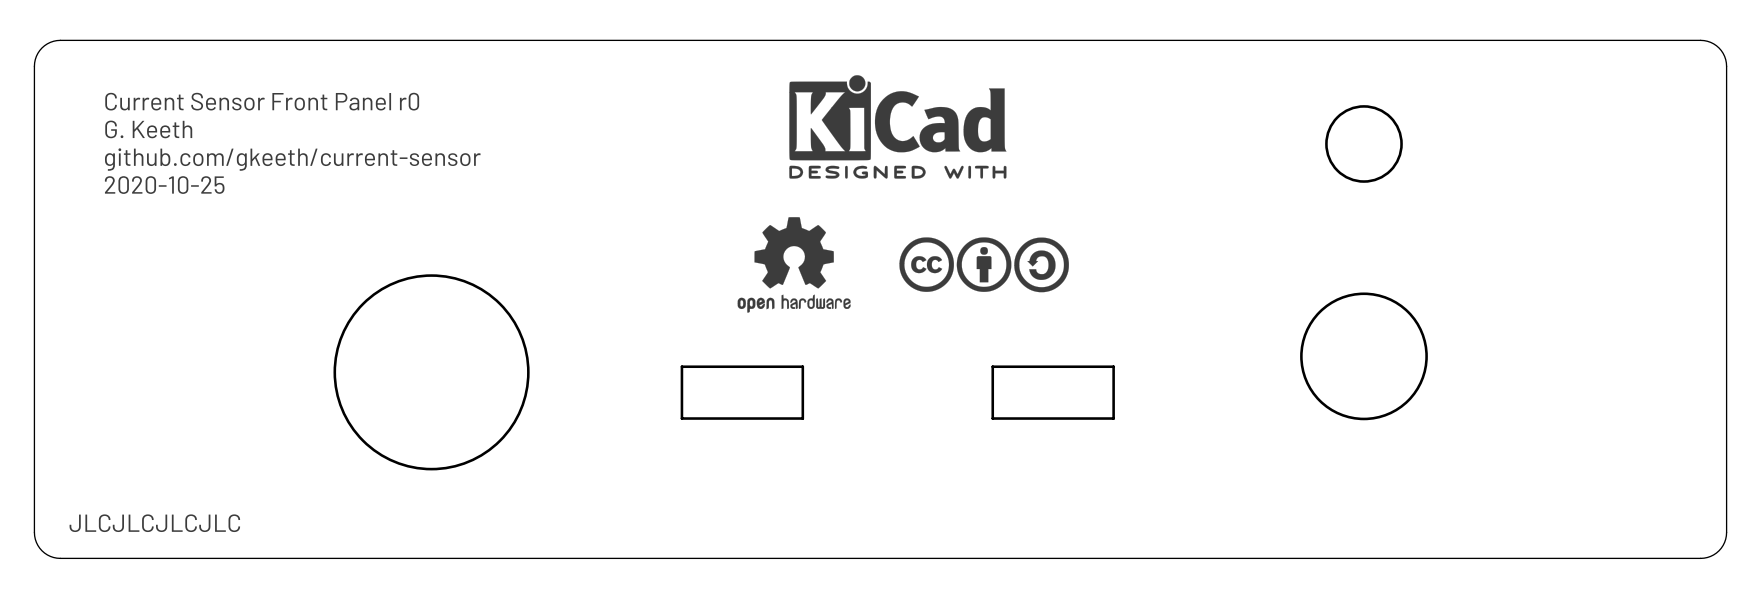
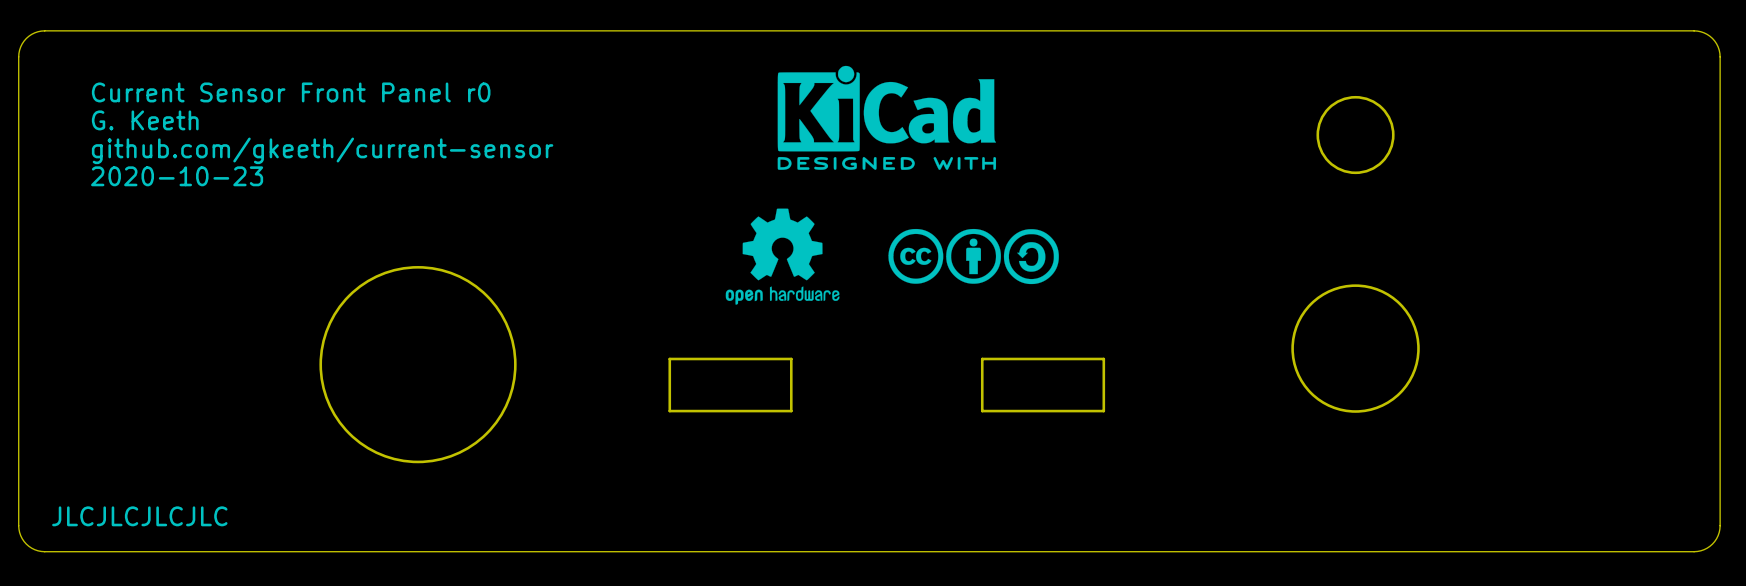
text: 2020-10-25 (164, 185) -> 2020-10-23 (177, 176)

